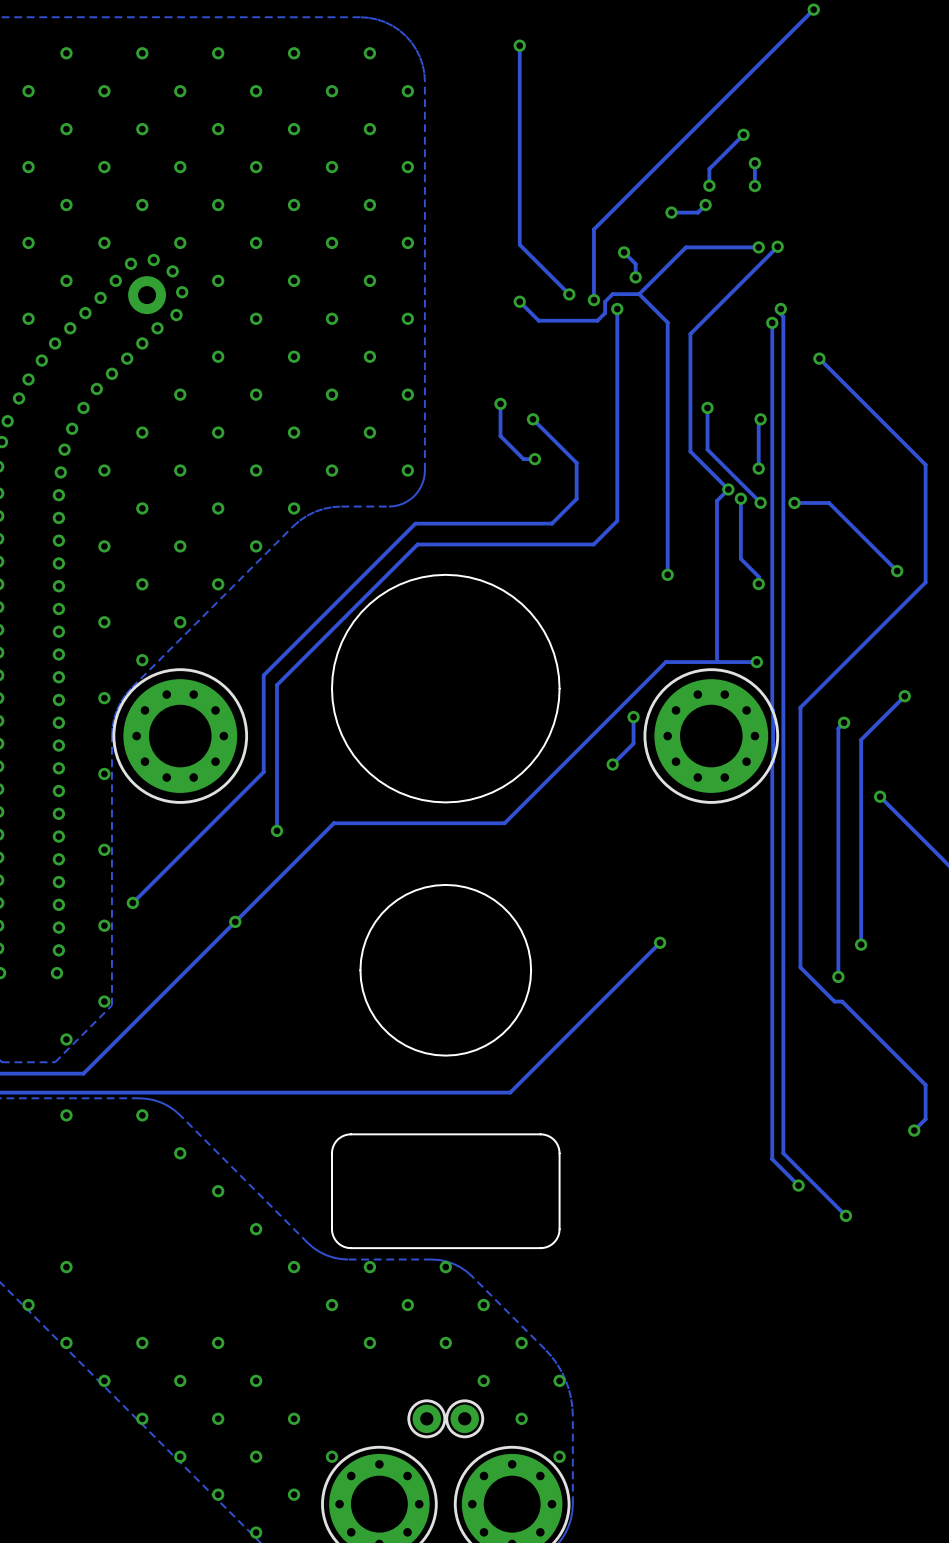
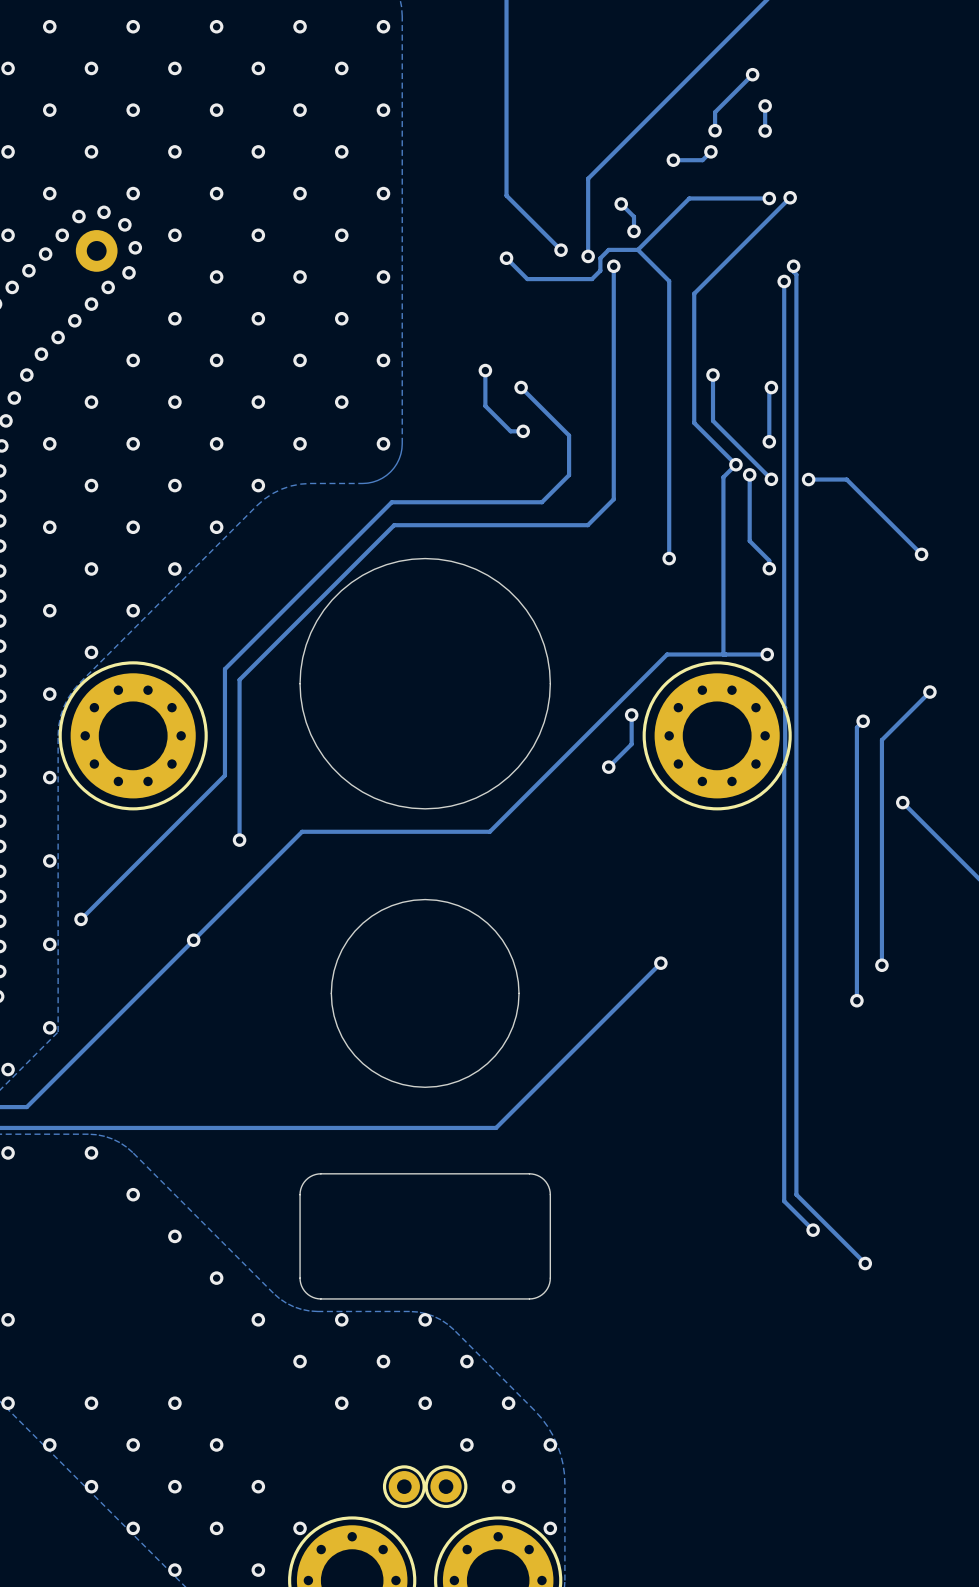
track: (819, 358) (925, 464) (925, 582) (800, 707) (800, 967) (834, 1001) (842, 1001) (925, 1085) (925, 1119) (914, 1130) -> none
via: (819, 358) -> none
via: (914, 1130) -> none

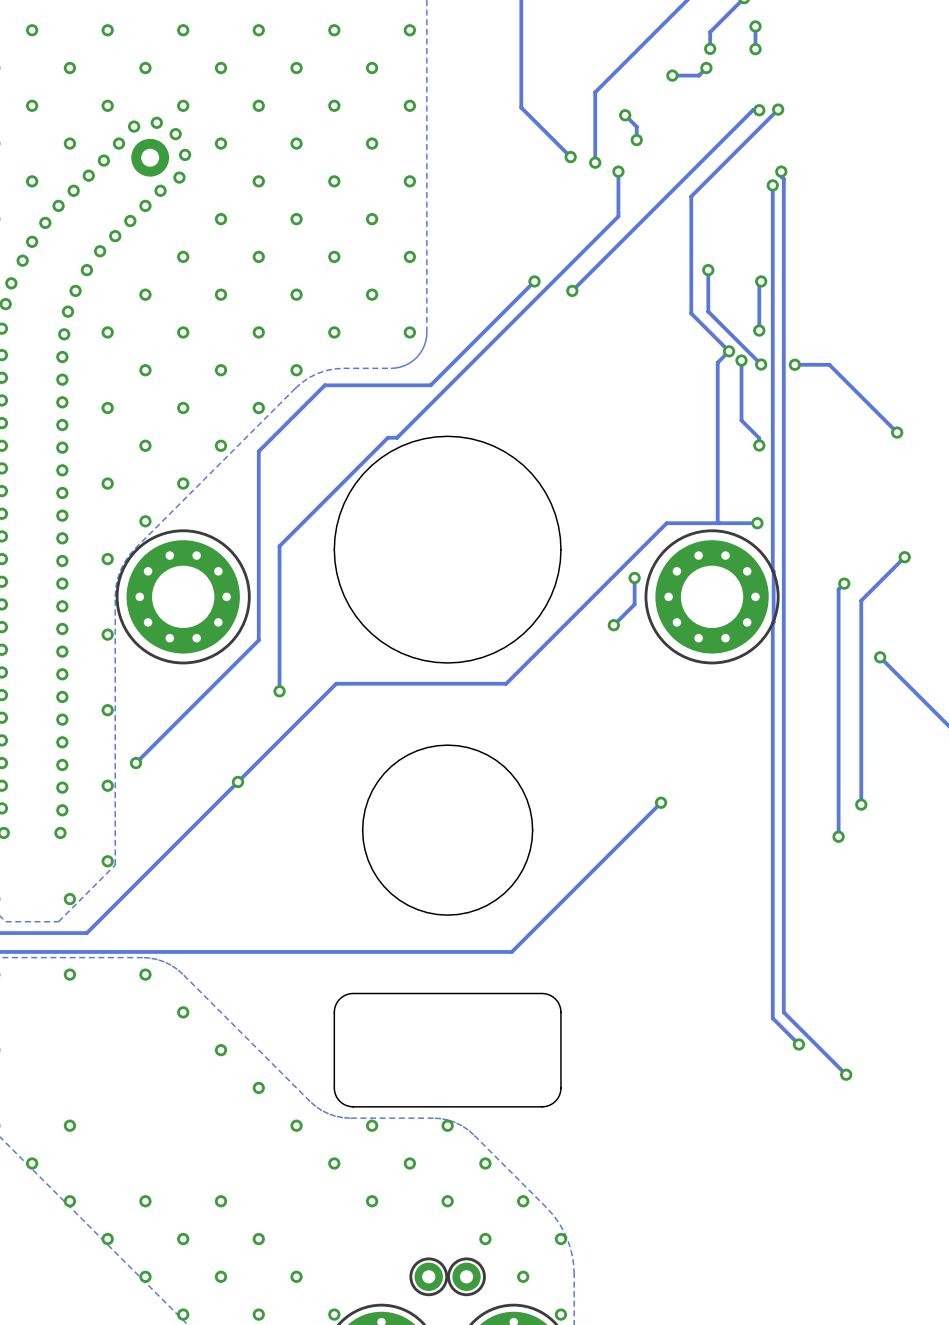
track: (762, 198) (689, 198) (637, 249) -> (752, 110) (572, 290)
track: (637, 249) (608, 249) (600, 258) (600, 270) (592, 279) (527, 279) (506, 258) -> none
track: (637, 249) (669, 281) (669, 558) -> none
via: (506, 258) -> none
track: (613, 315) (613, 499) (587, 525) (394, 525) (359, 560) -> (618, 216) (397, 437) (387, 437)
track: (485, 370) (485, 406) (510, 431) (523, 431) -> none
via: (485, 370) -> none
track: (521, 387) (569, 435) (569, 475) (541, 502) (406, 502) -> (534, 281) (430, 385)
via: none -> (572, 290)
via: (523, 431) -> none
track: (391, 502) (224, 669) (224, 775) (216, 783) -> (417, 385) (324, 385) (258, 451) (258, 640)
via: (669, 558) -> none

